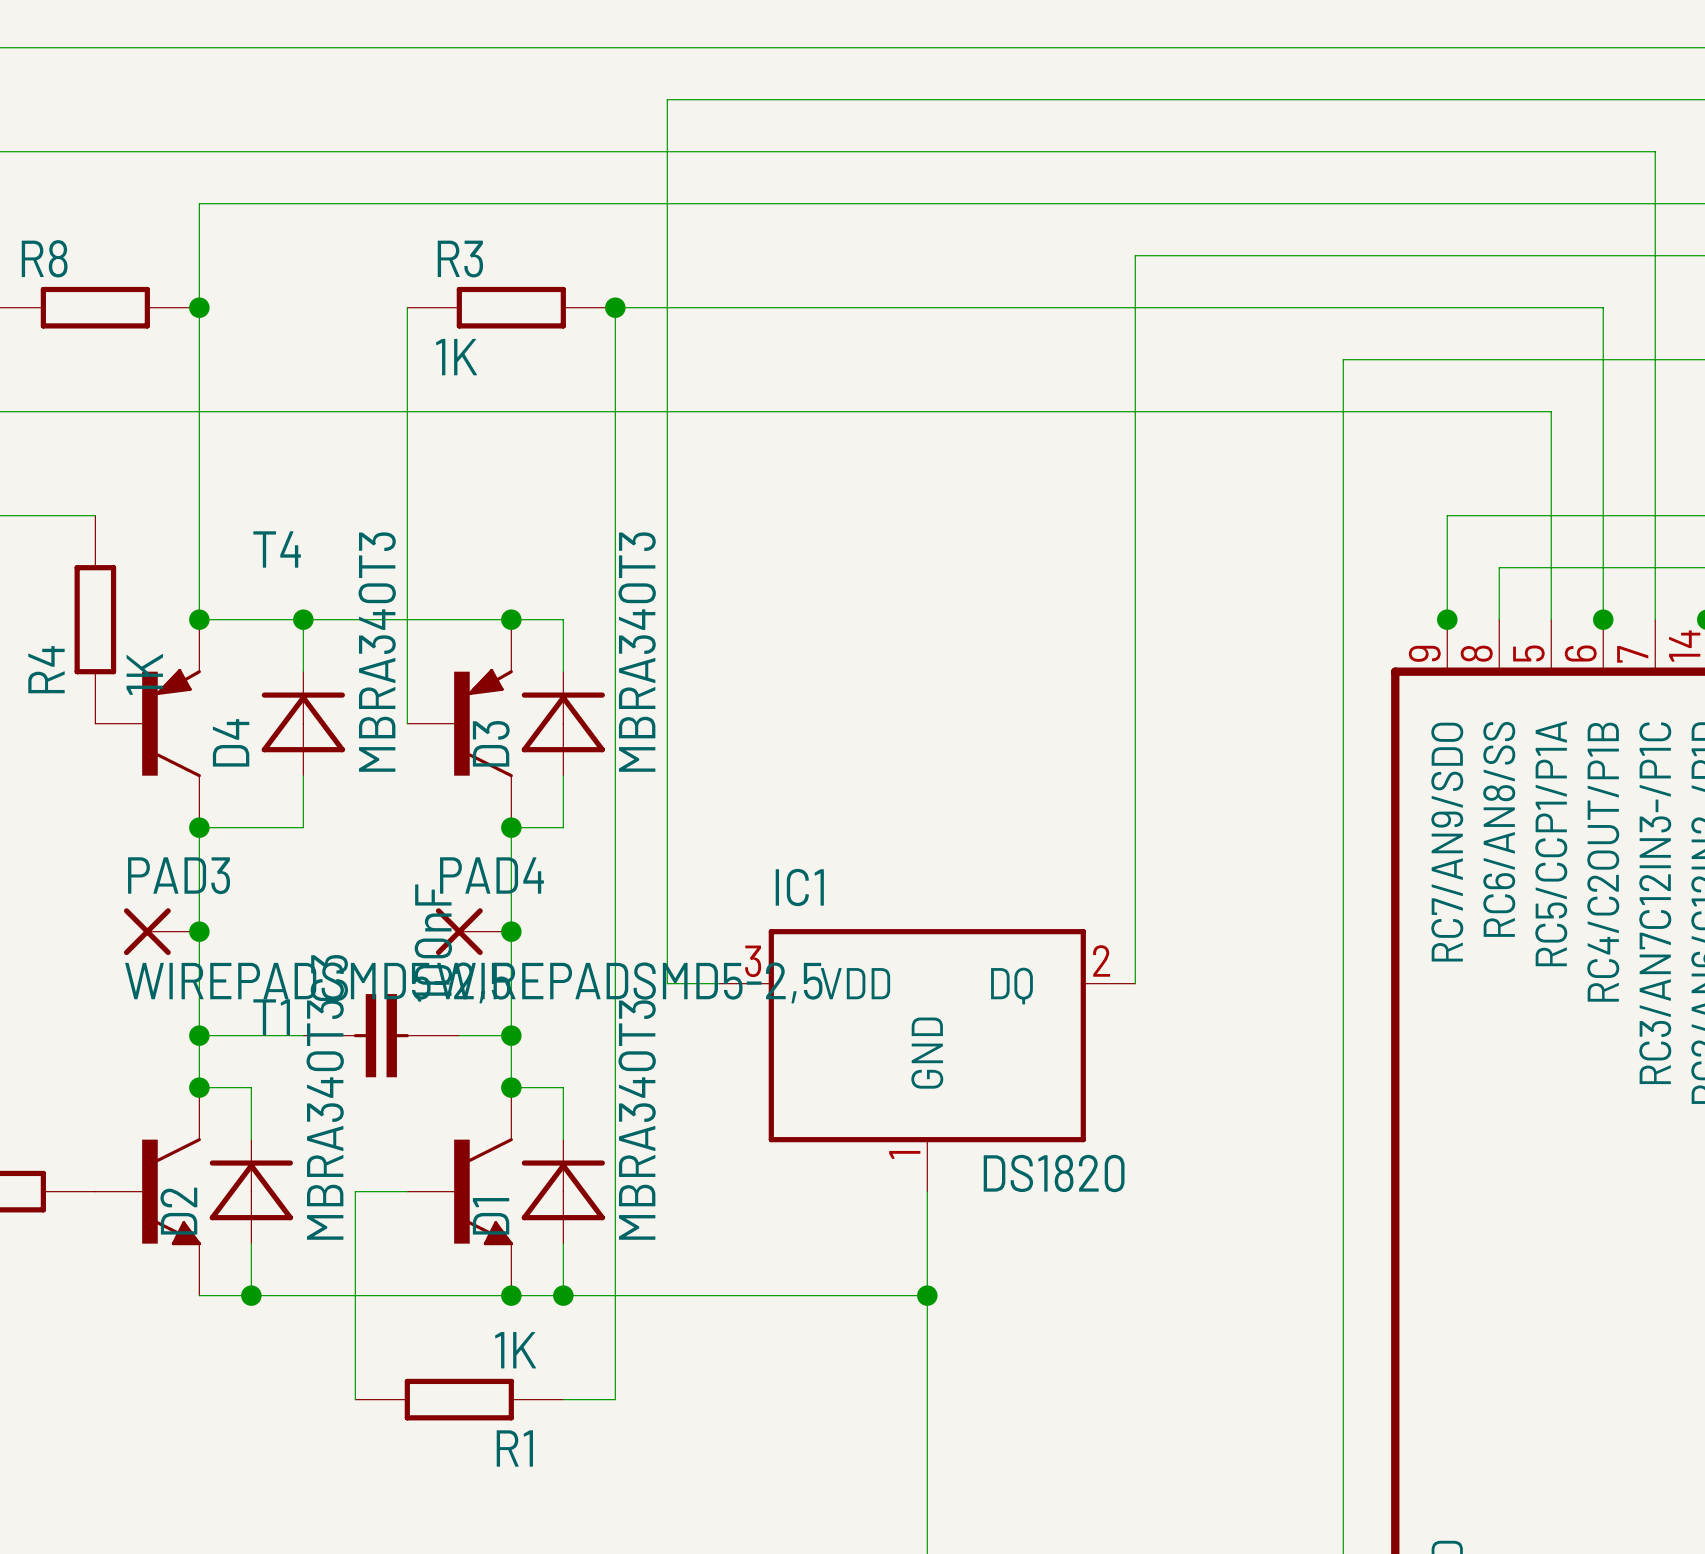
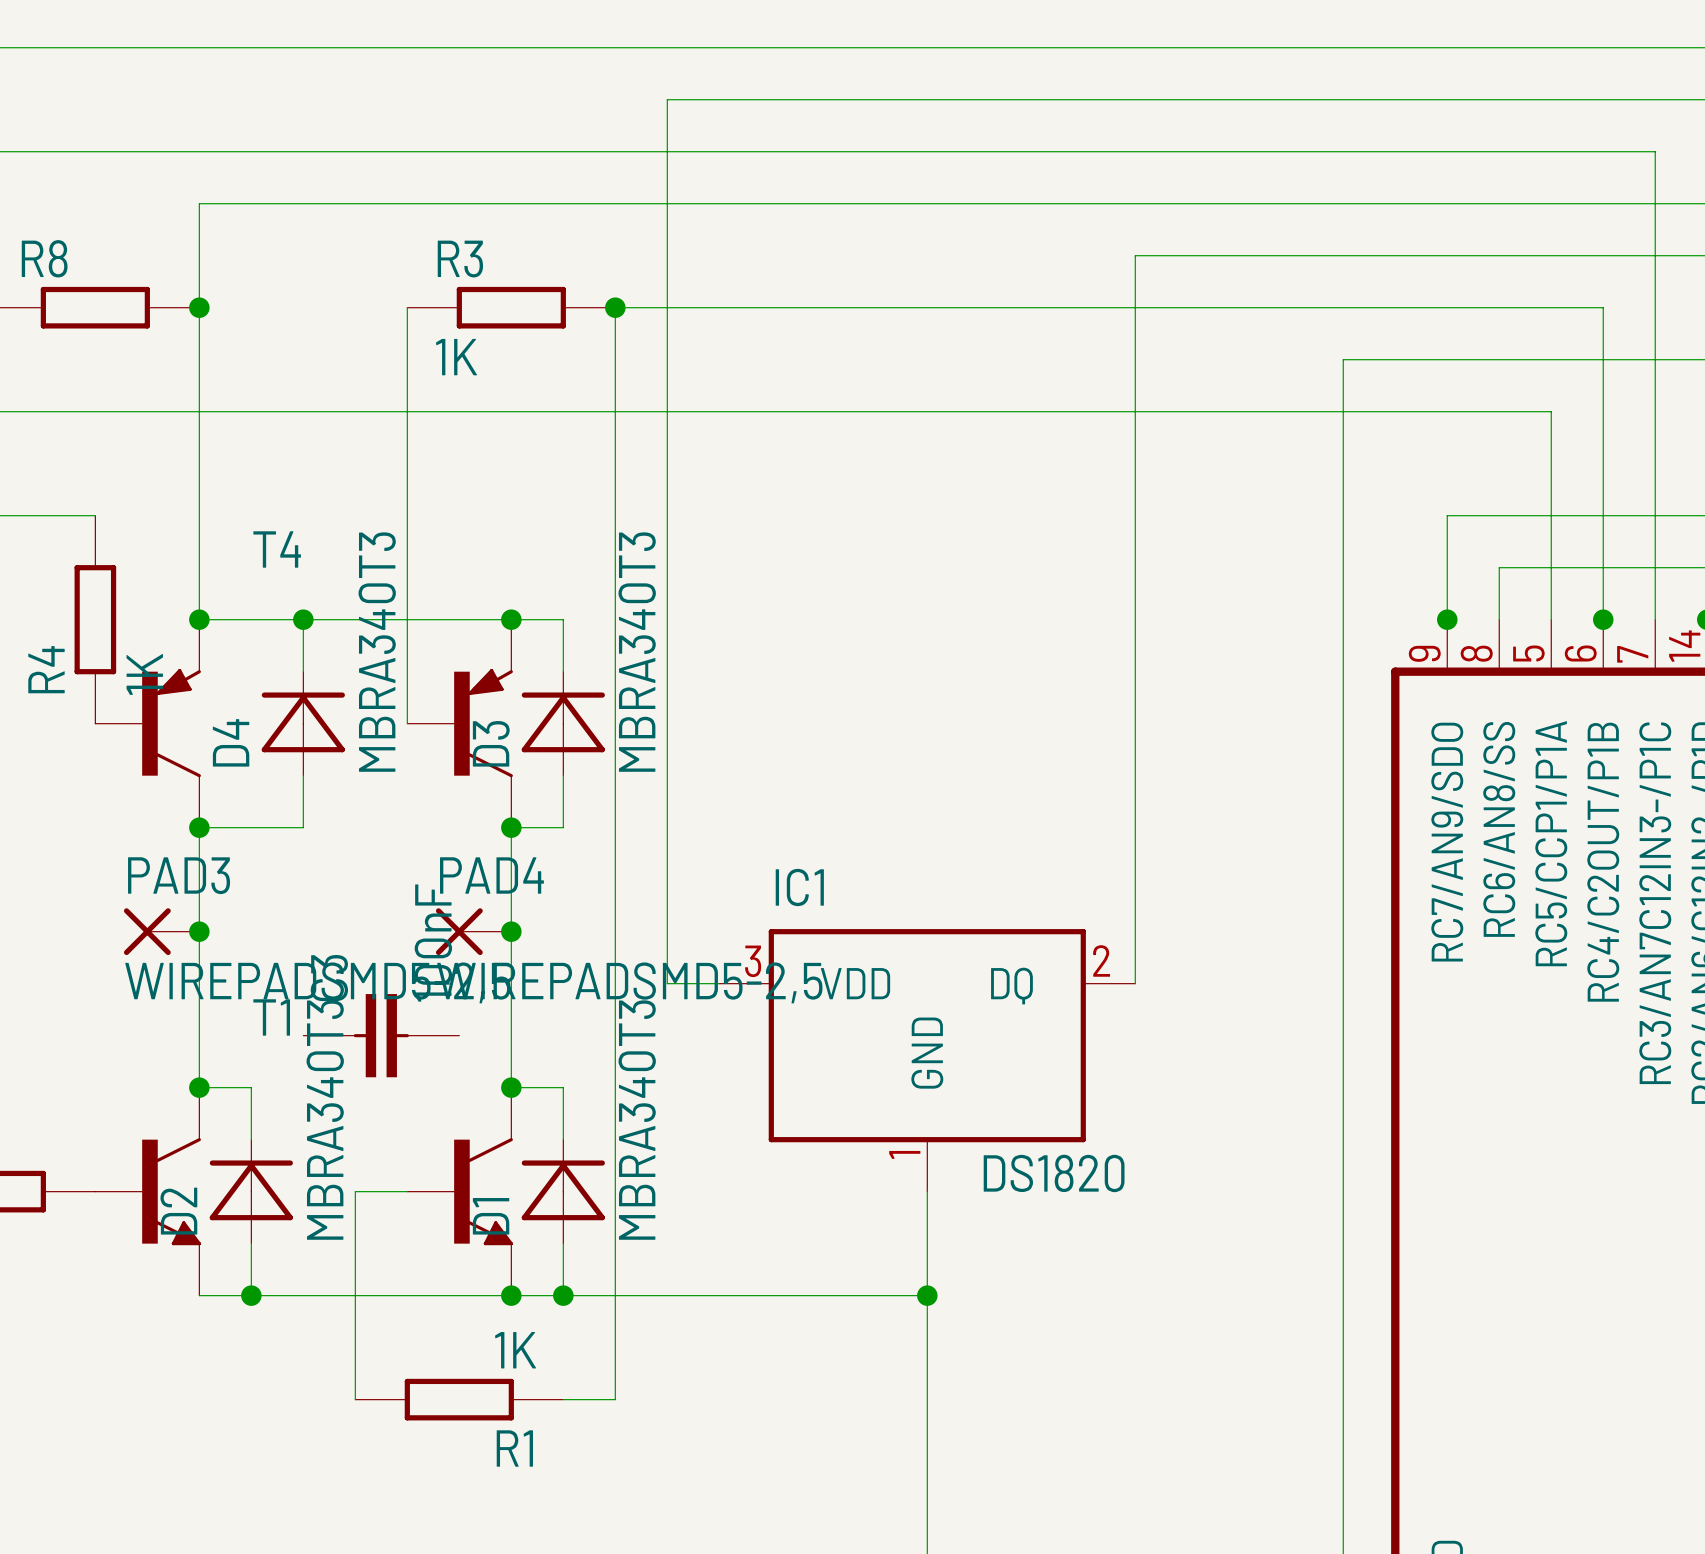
wire: (199, 1035) (303, 1035) -> none
junction: (199, 1035) -> none
wire: (459, 1035) (511, 1035) -> none
junction: (511, 1035) -> none

